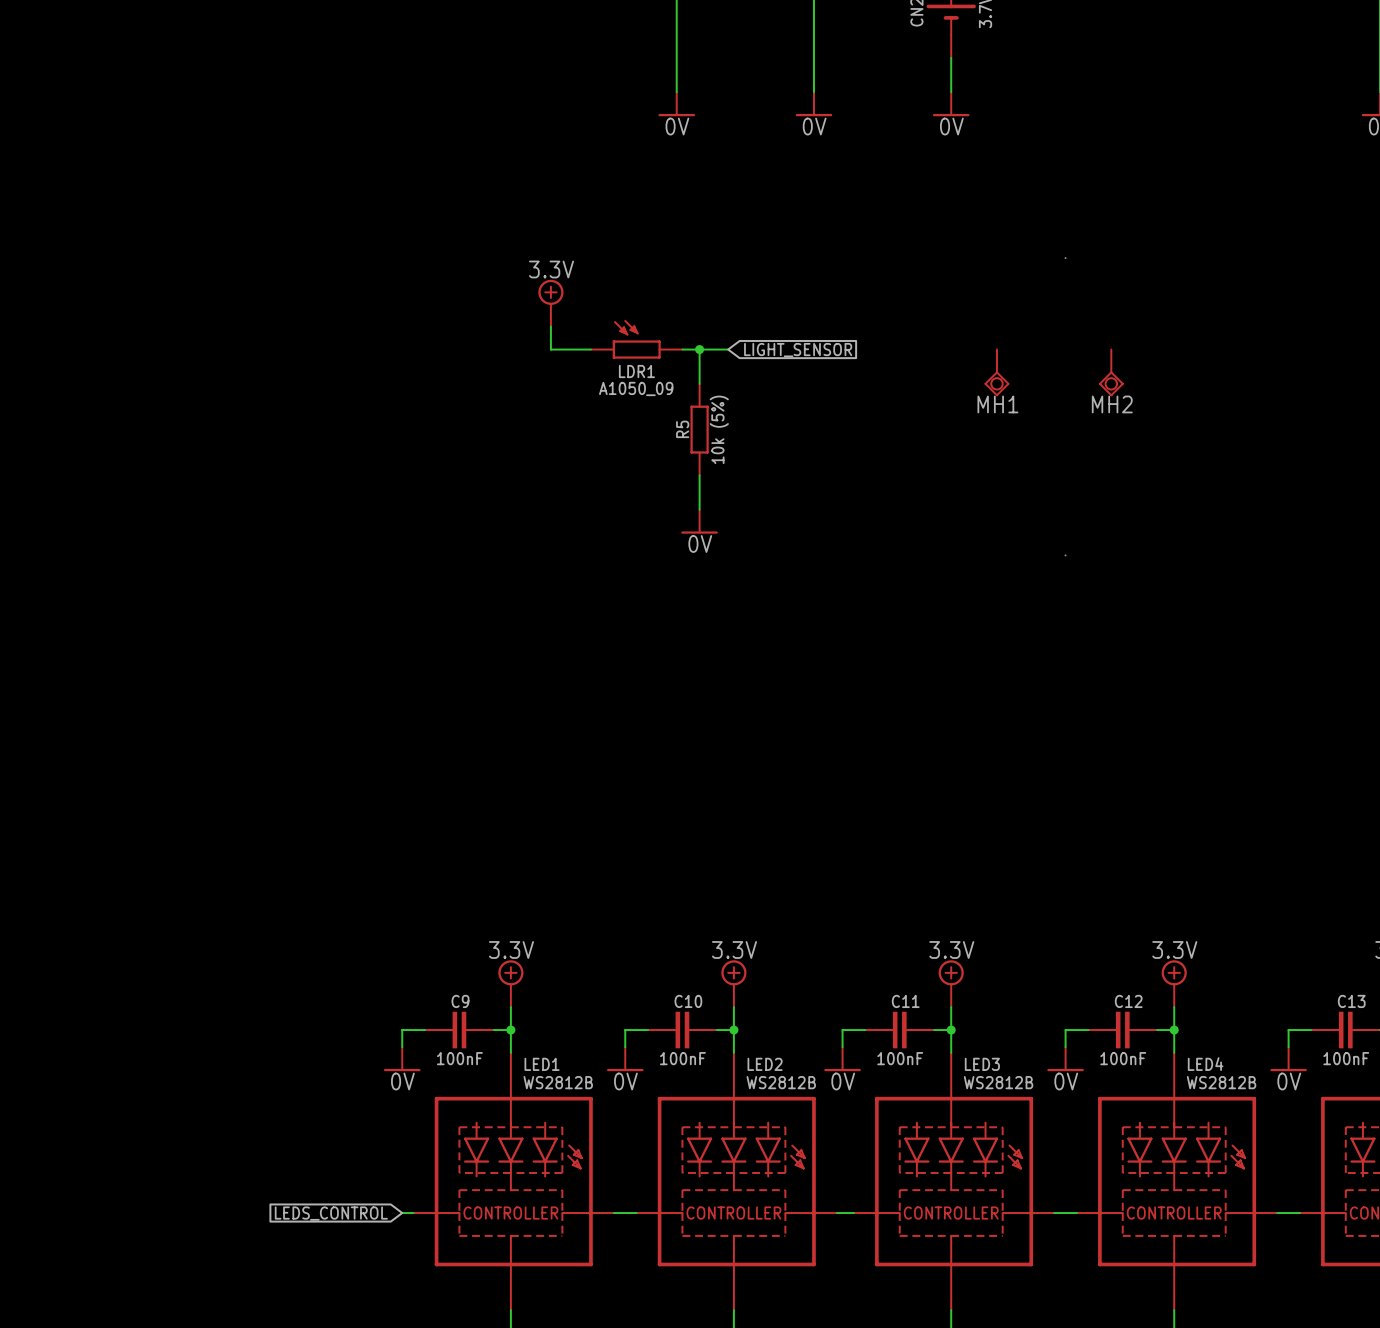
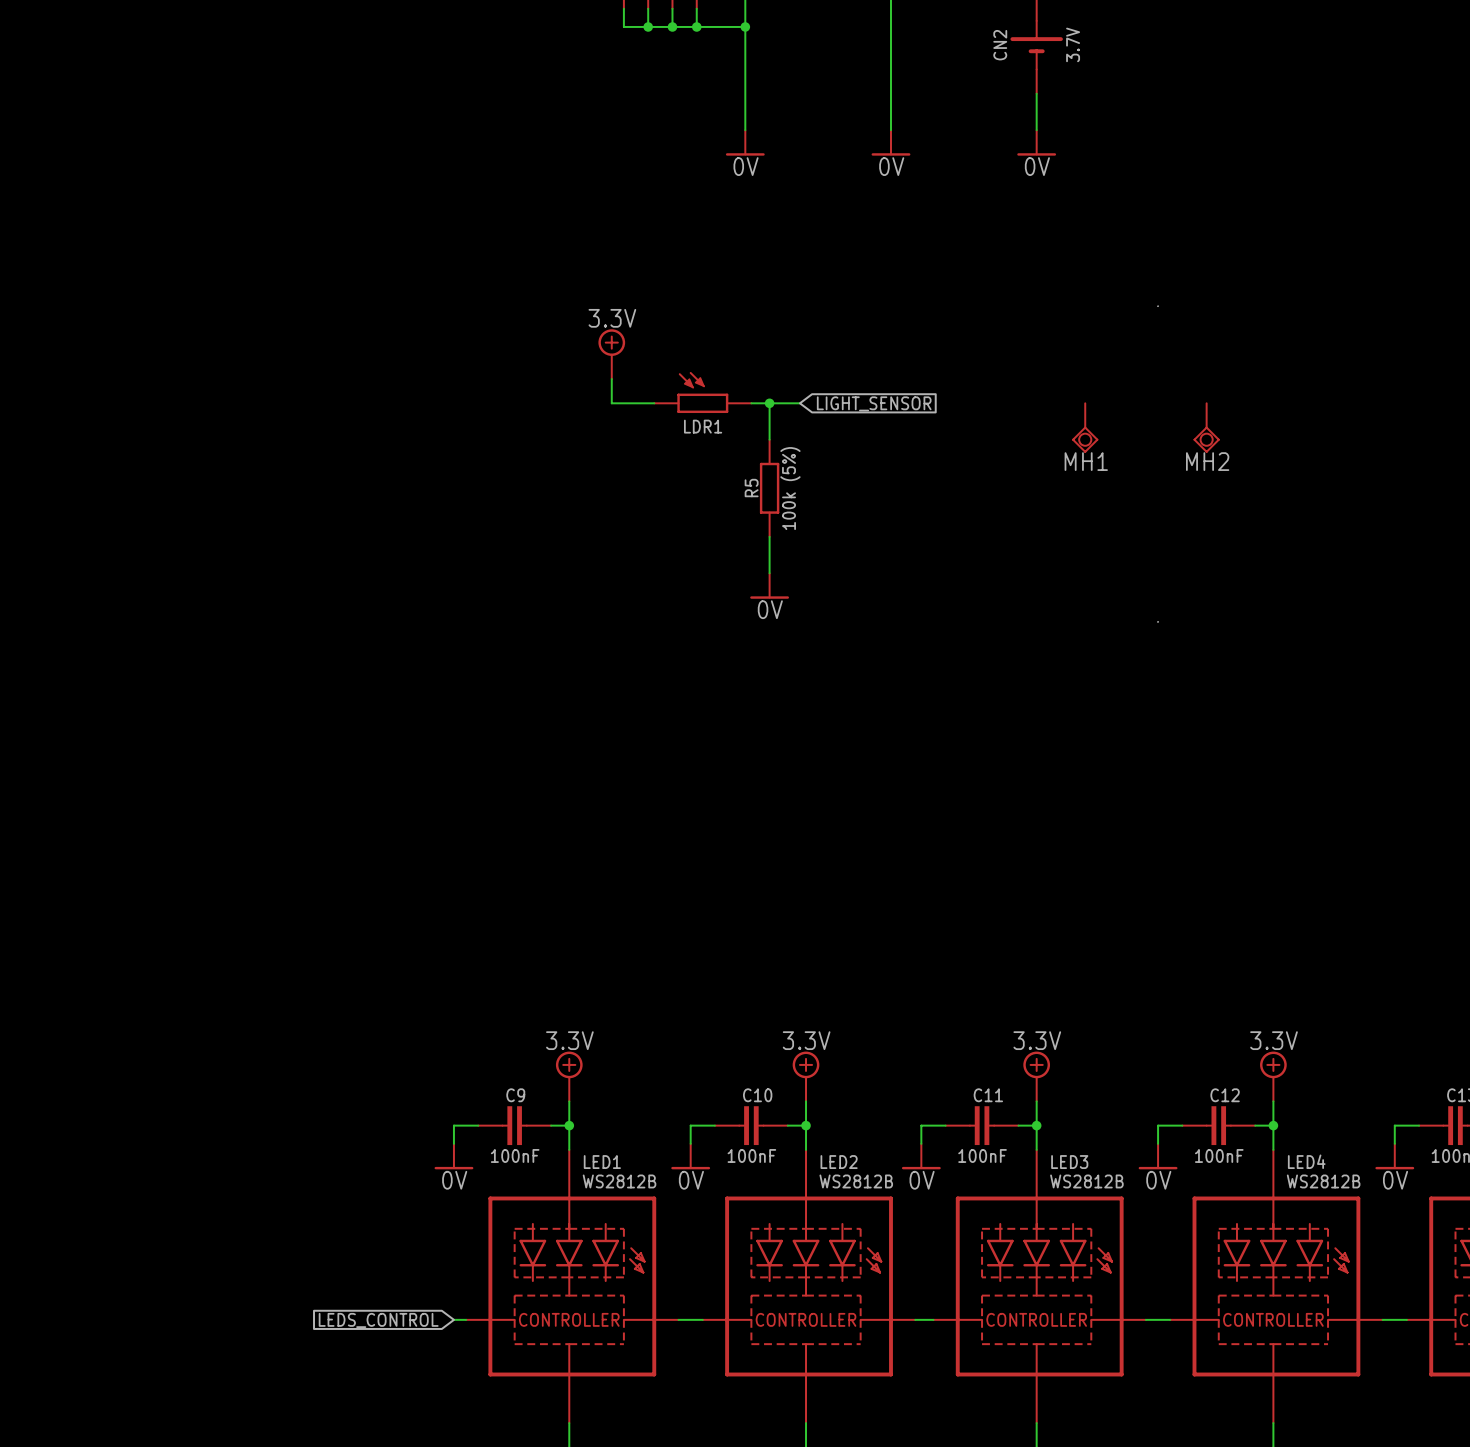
LDR1 value: A1050_09 (636, 388) -> none
R5 value: 10k (5%) (719, 429) -> 100k (5%) (790, 488)

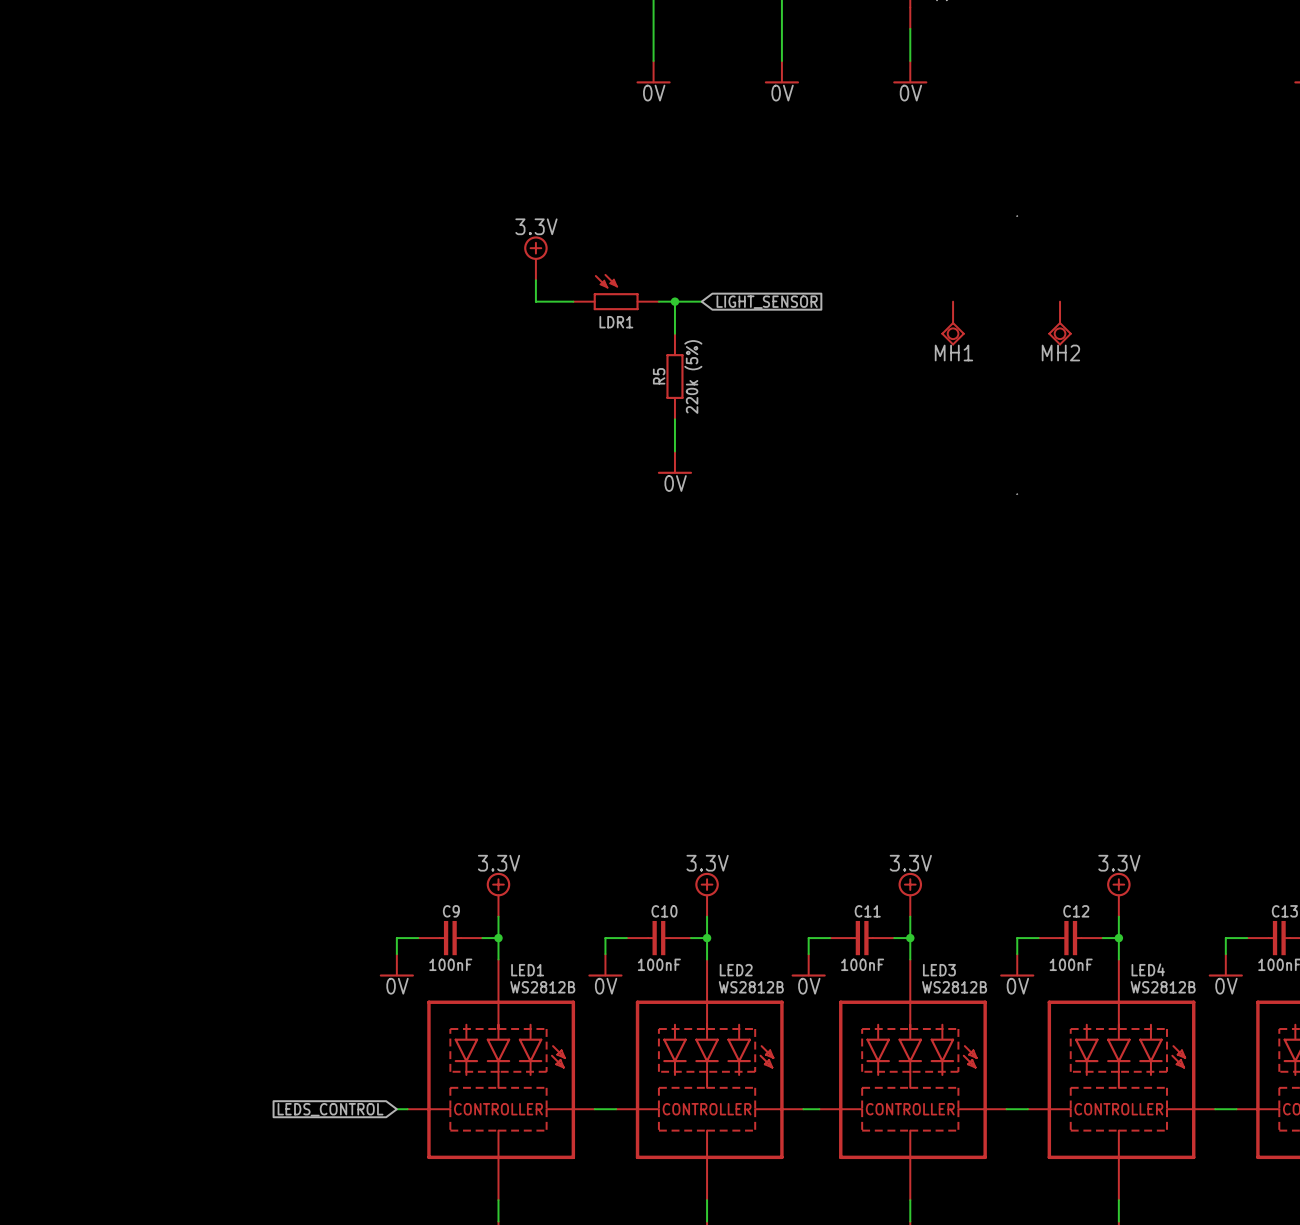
R5 value: 100k (5%) (790, 488) -> 220k (5%) (693, 376)

